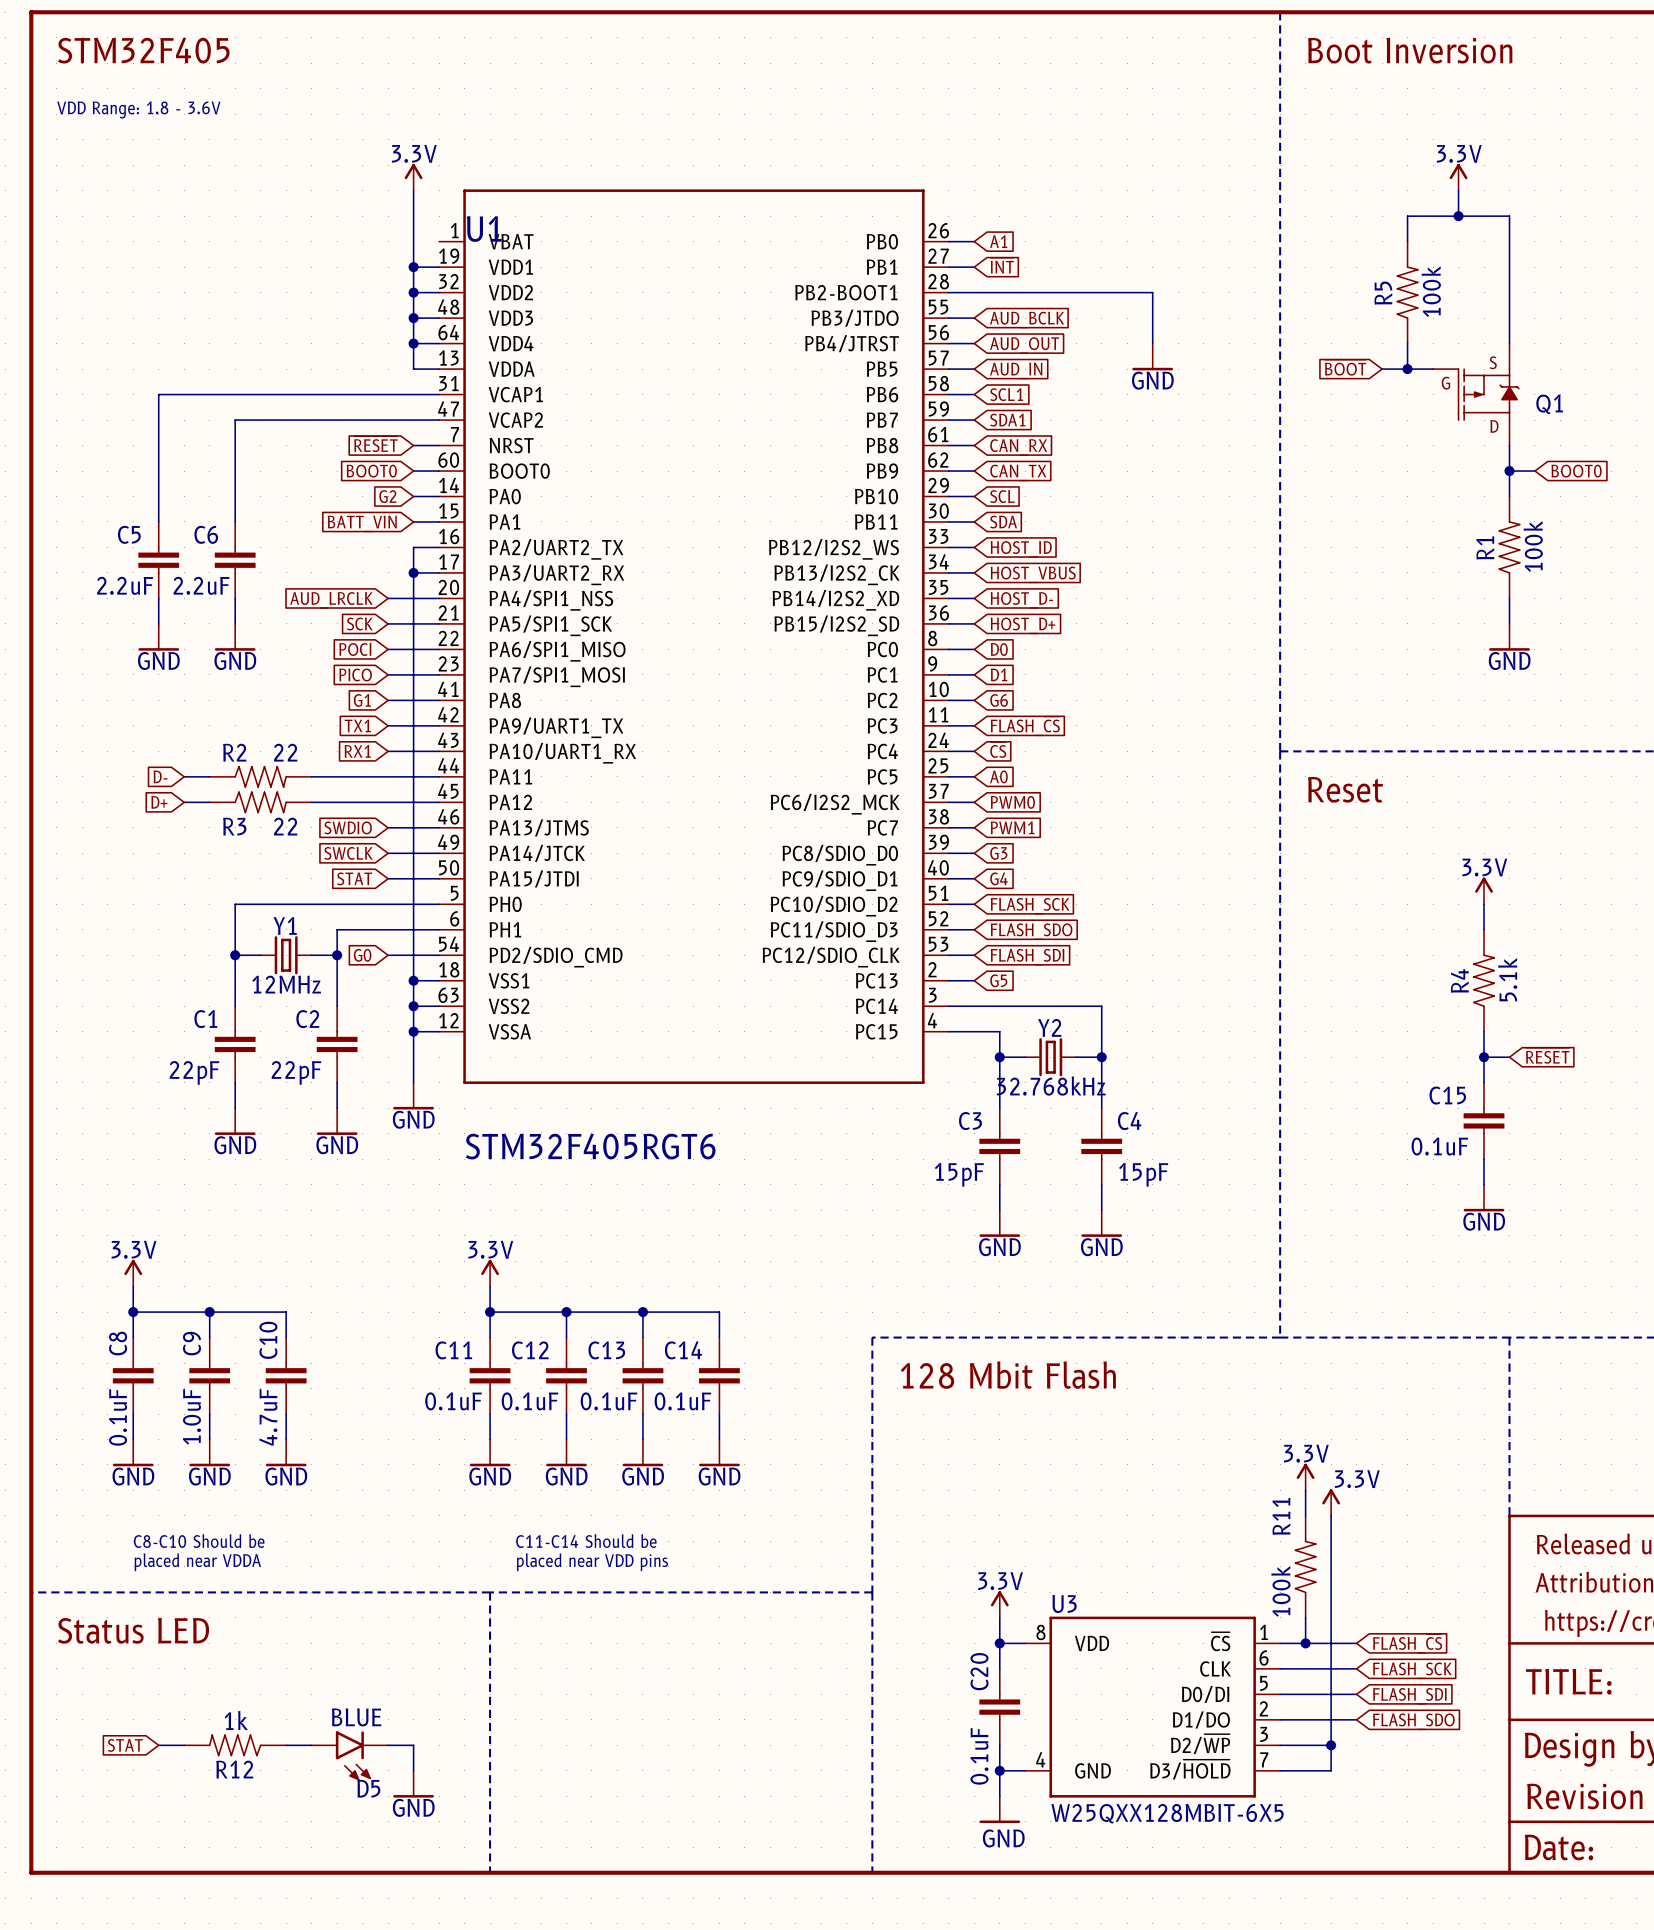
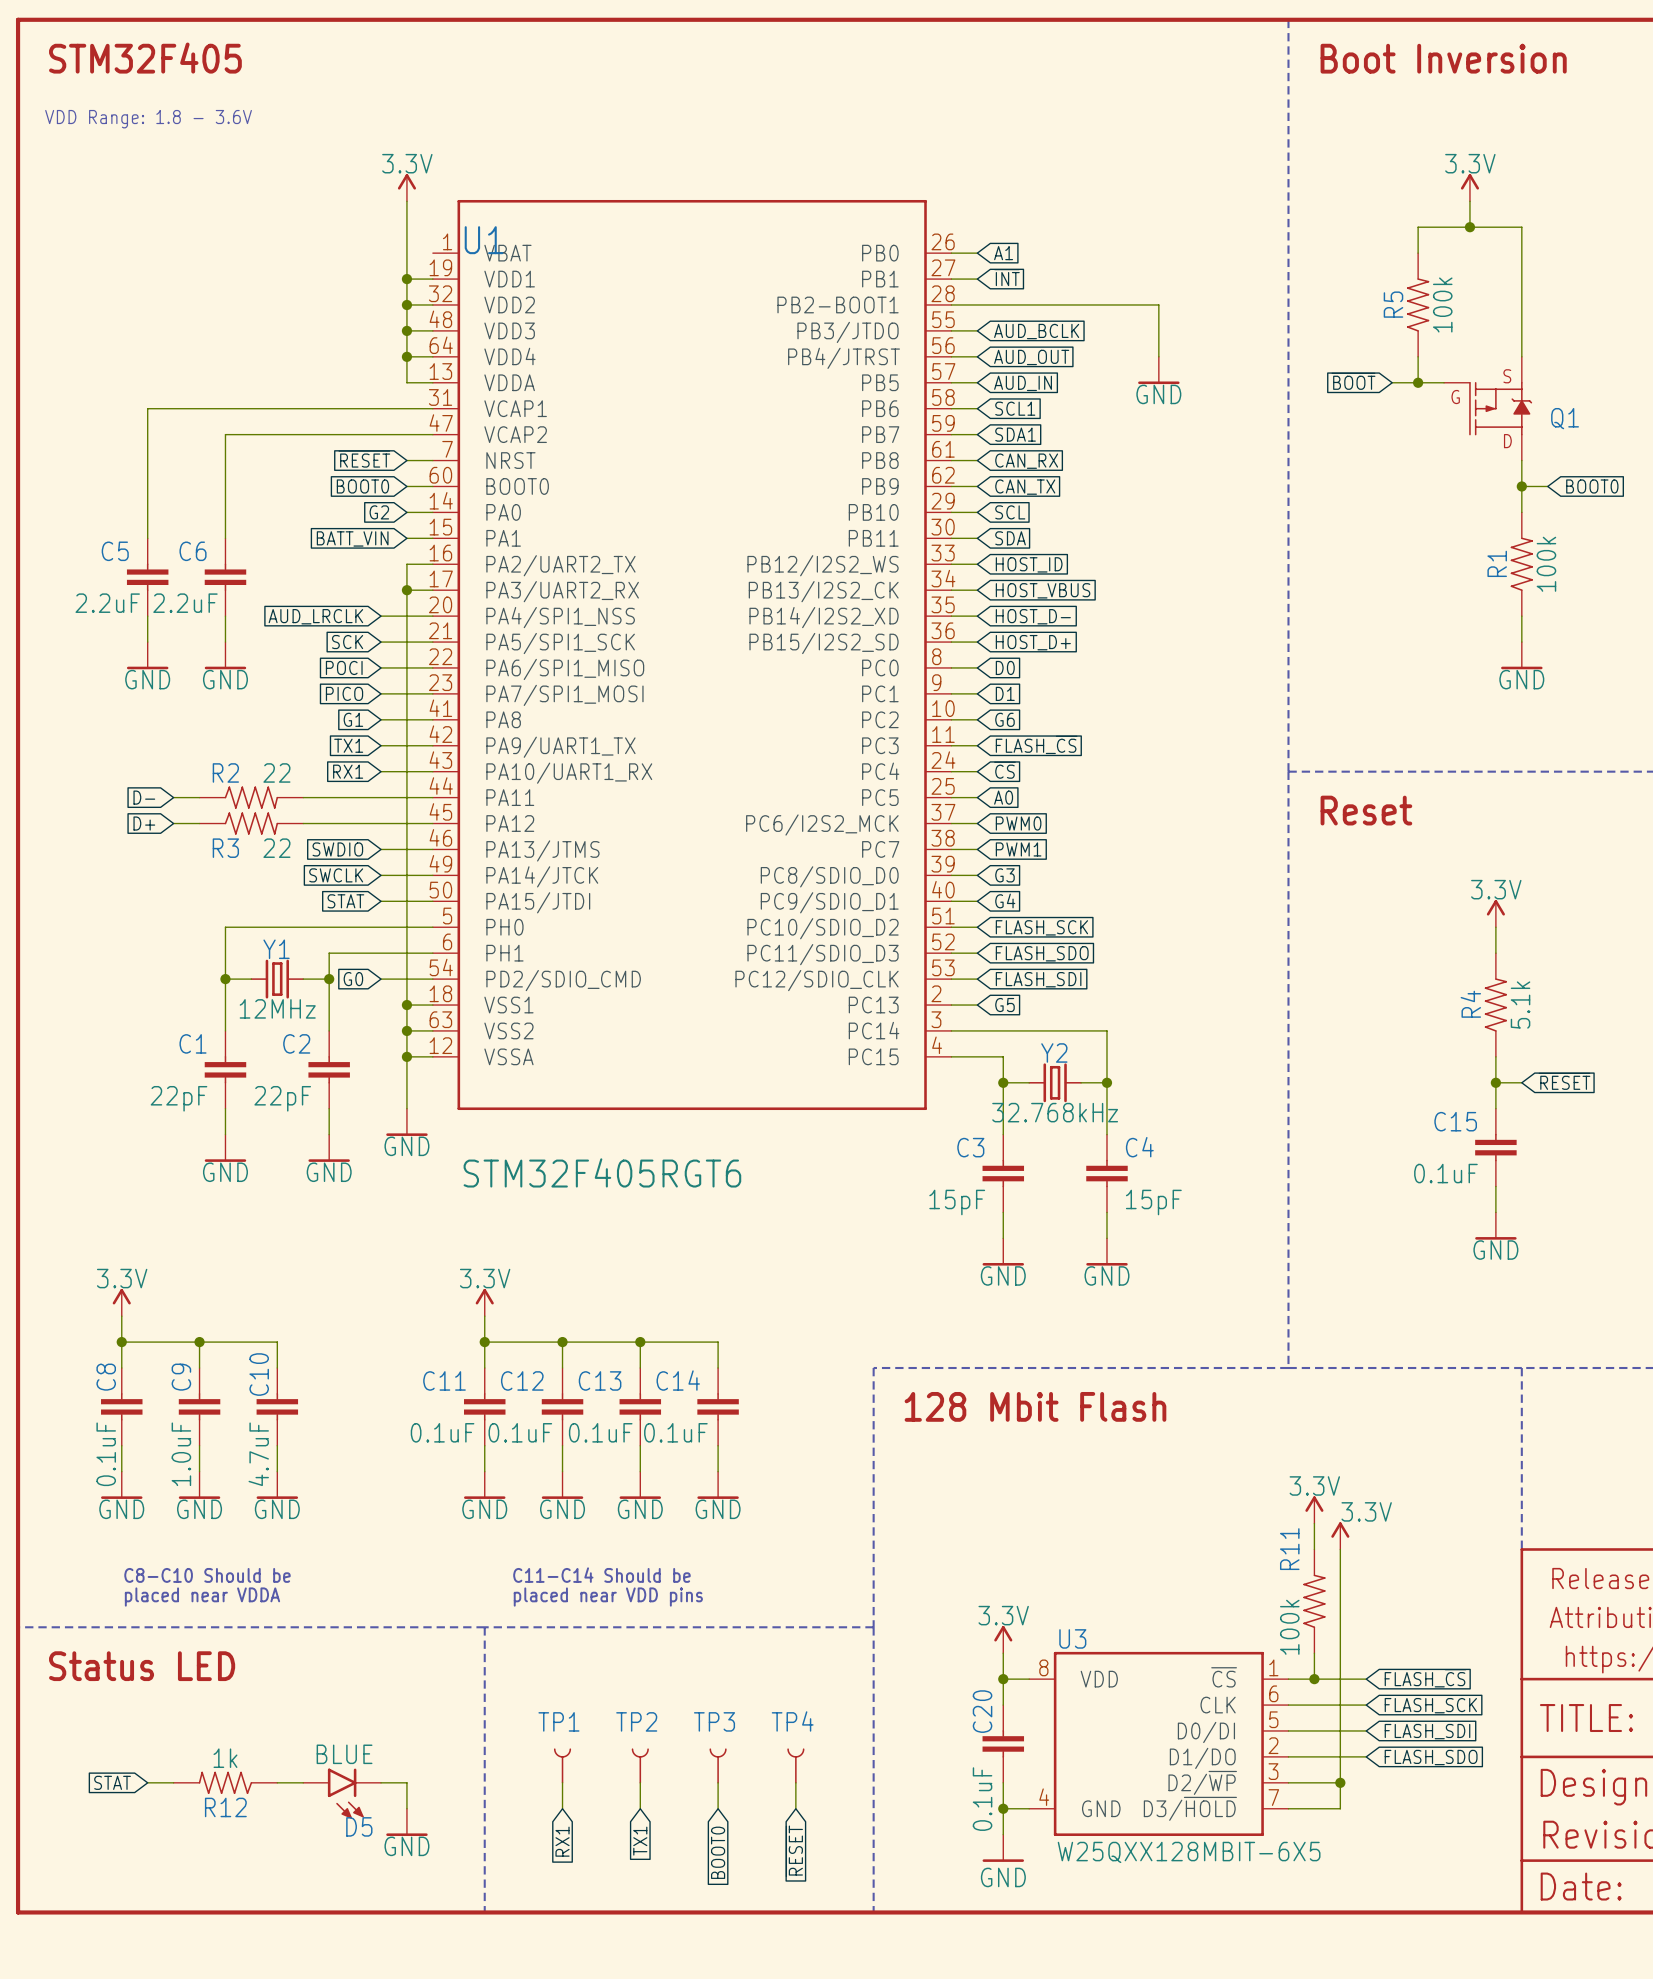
TP1: none -> (562, 1765)
TP2: none -> (640, 1765)
TP3: none -> (718, 1765)
TP4: none -> (795, 1765)
wire: none -> (562, 1782) (562, 1808)
wire: none -> (640, 1782) (640, 1808)
wire: none -> (718, 1782) (718, 1808)
wire: none -> (795, 1782) (795, 1808)
global label: none -> RX1 (562, 1841)
global label: none -> TX1 (640, 1841)
global label: none -> ~{RESET} (794, 1851)
global label: none -> BOOT0 (718, 1852)

